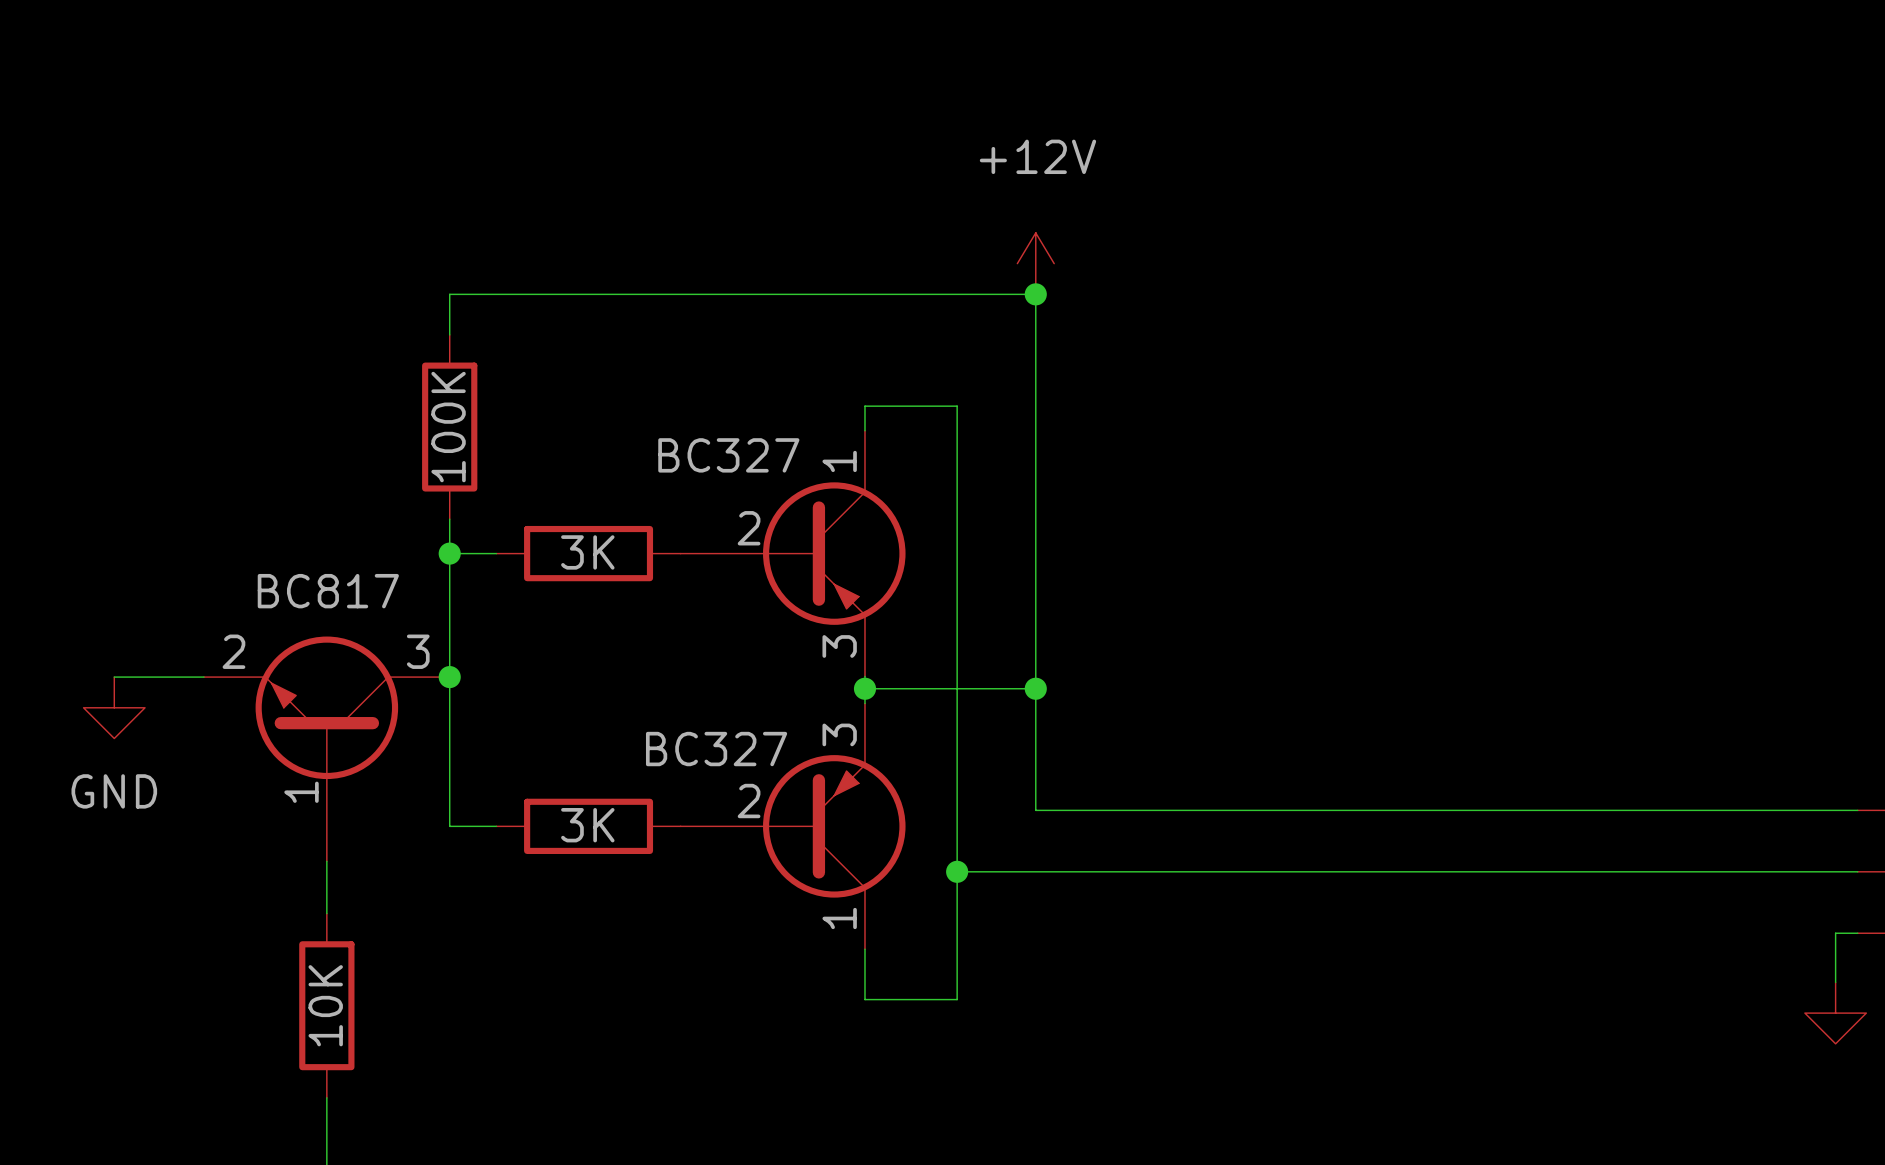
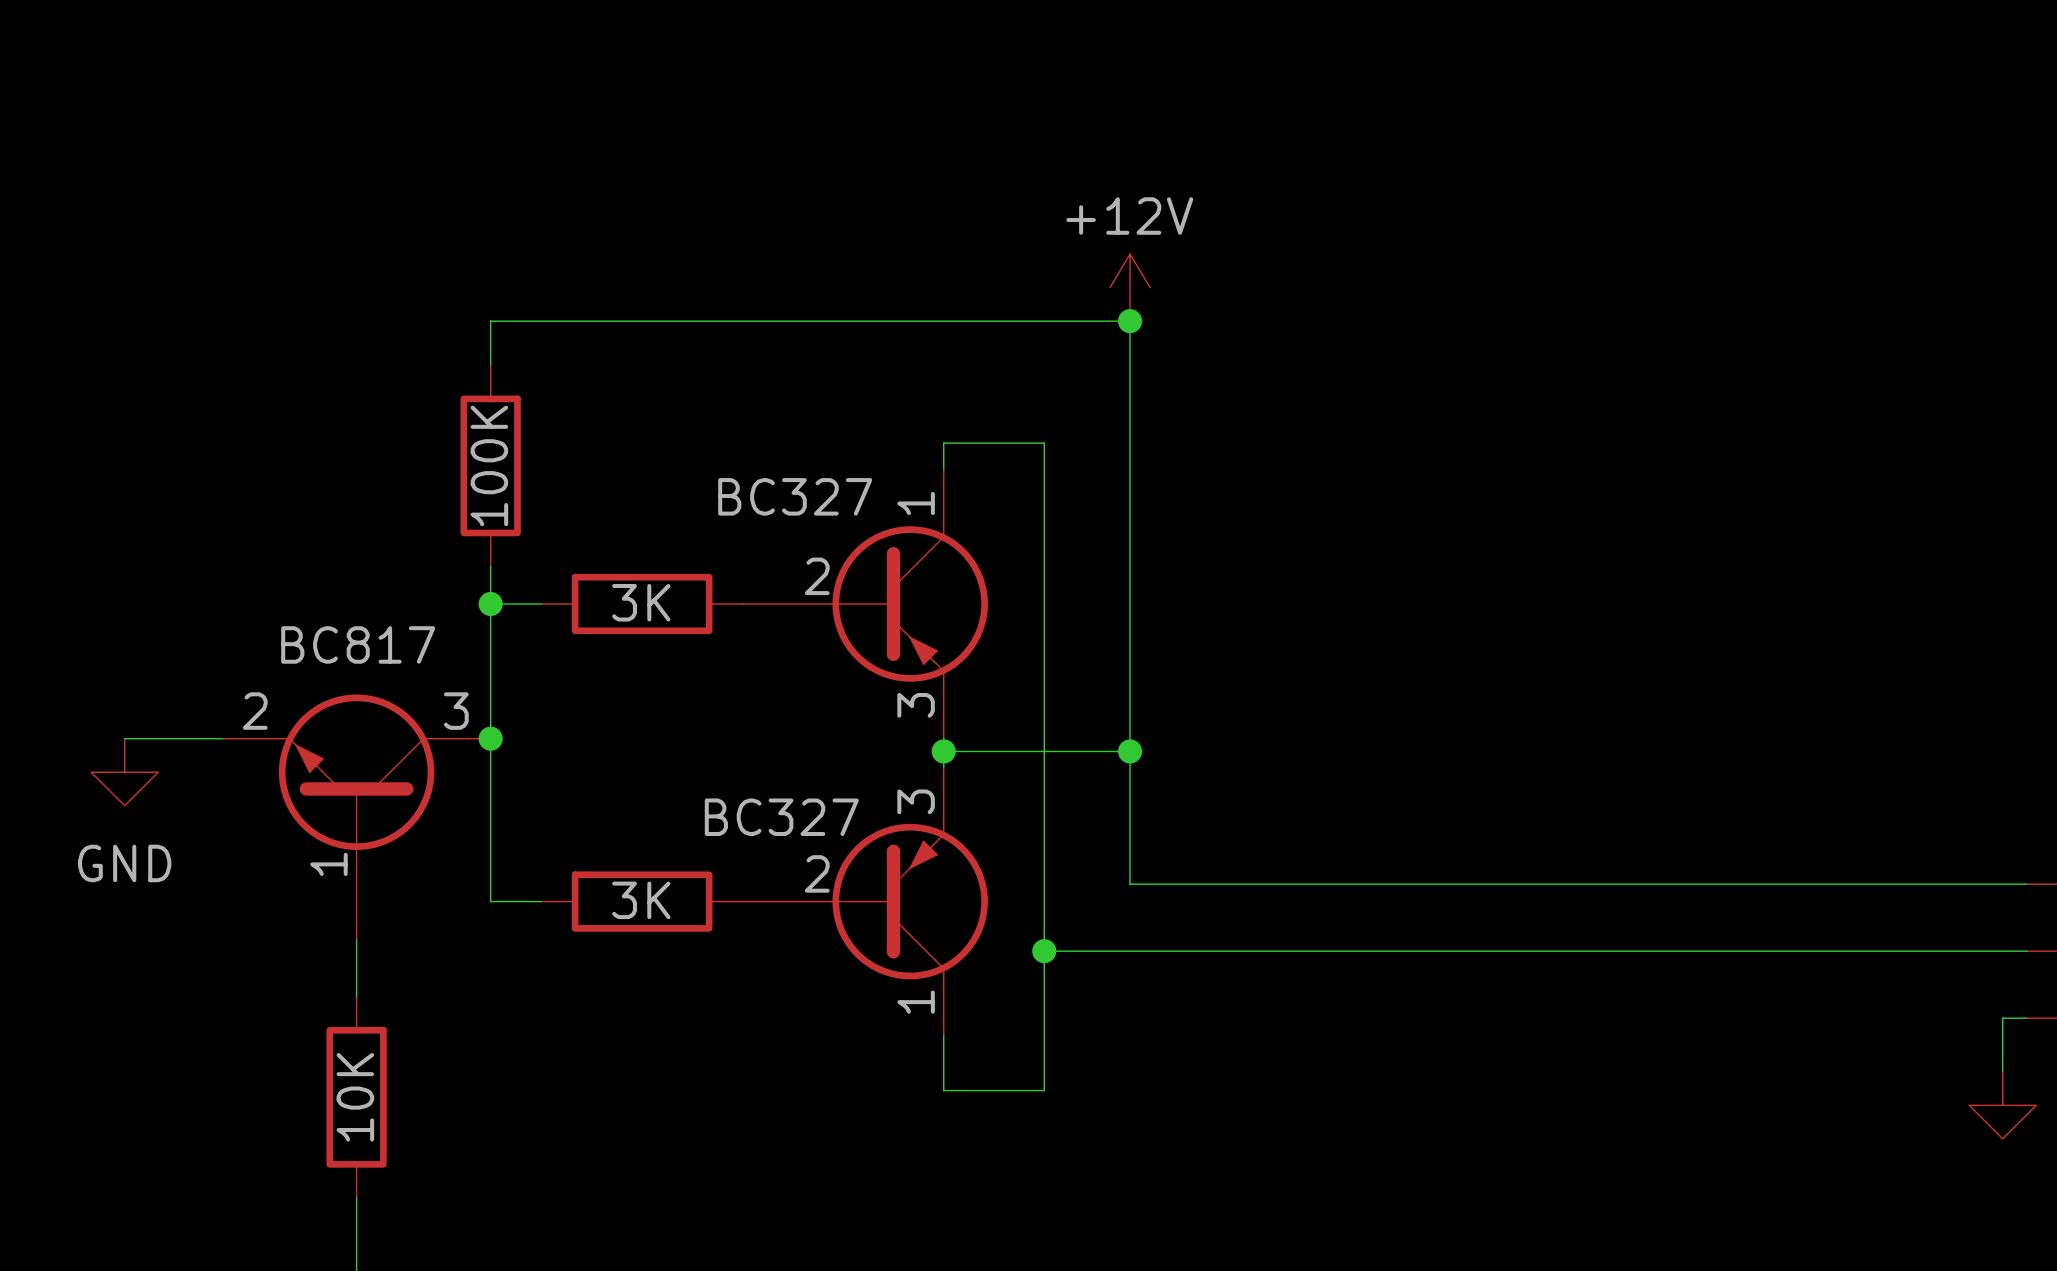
power symbol text position: +12V (1037, 156) -> +12V (1129, 216)

